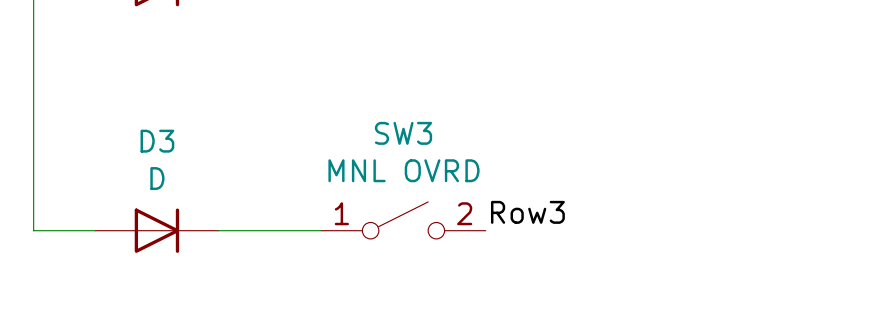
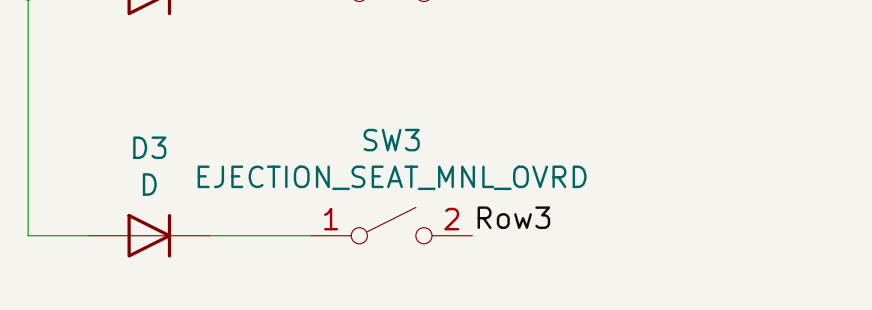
SW3 value: MNL OVRD (403, 170) -> EJECTION_SEAT_MNL_OVRD (392, 177)

